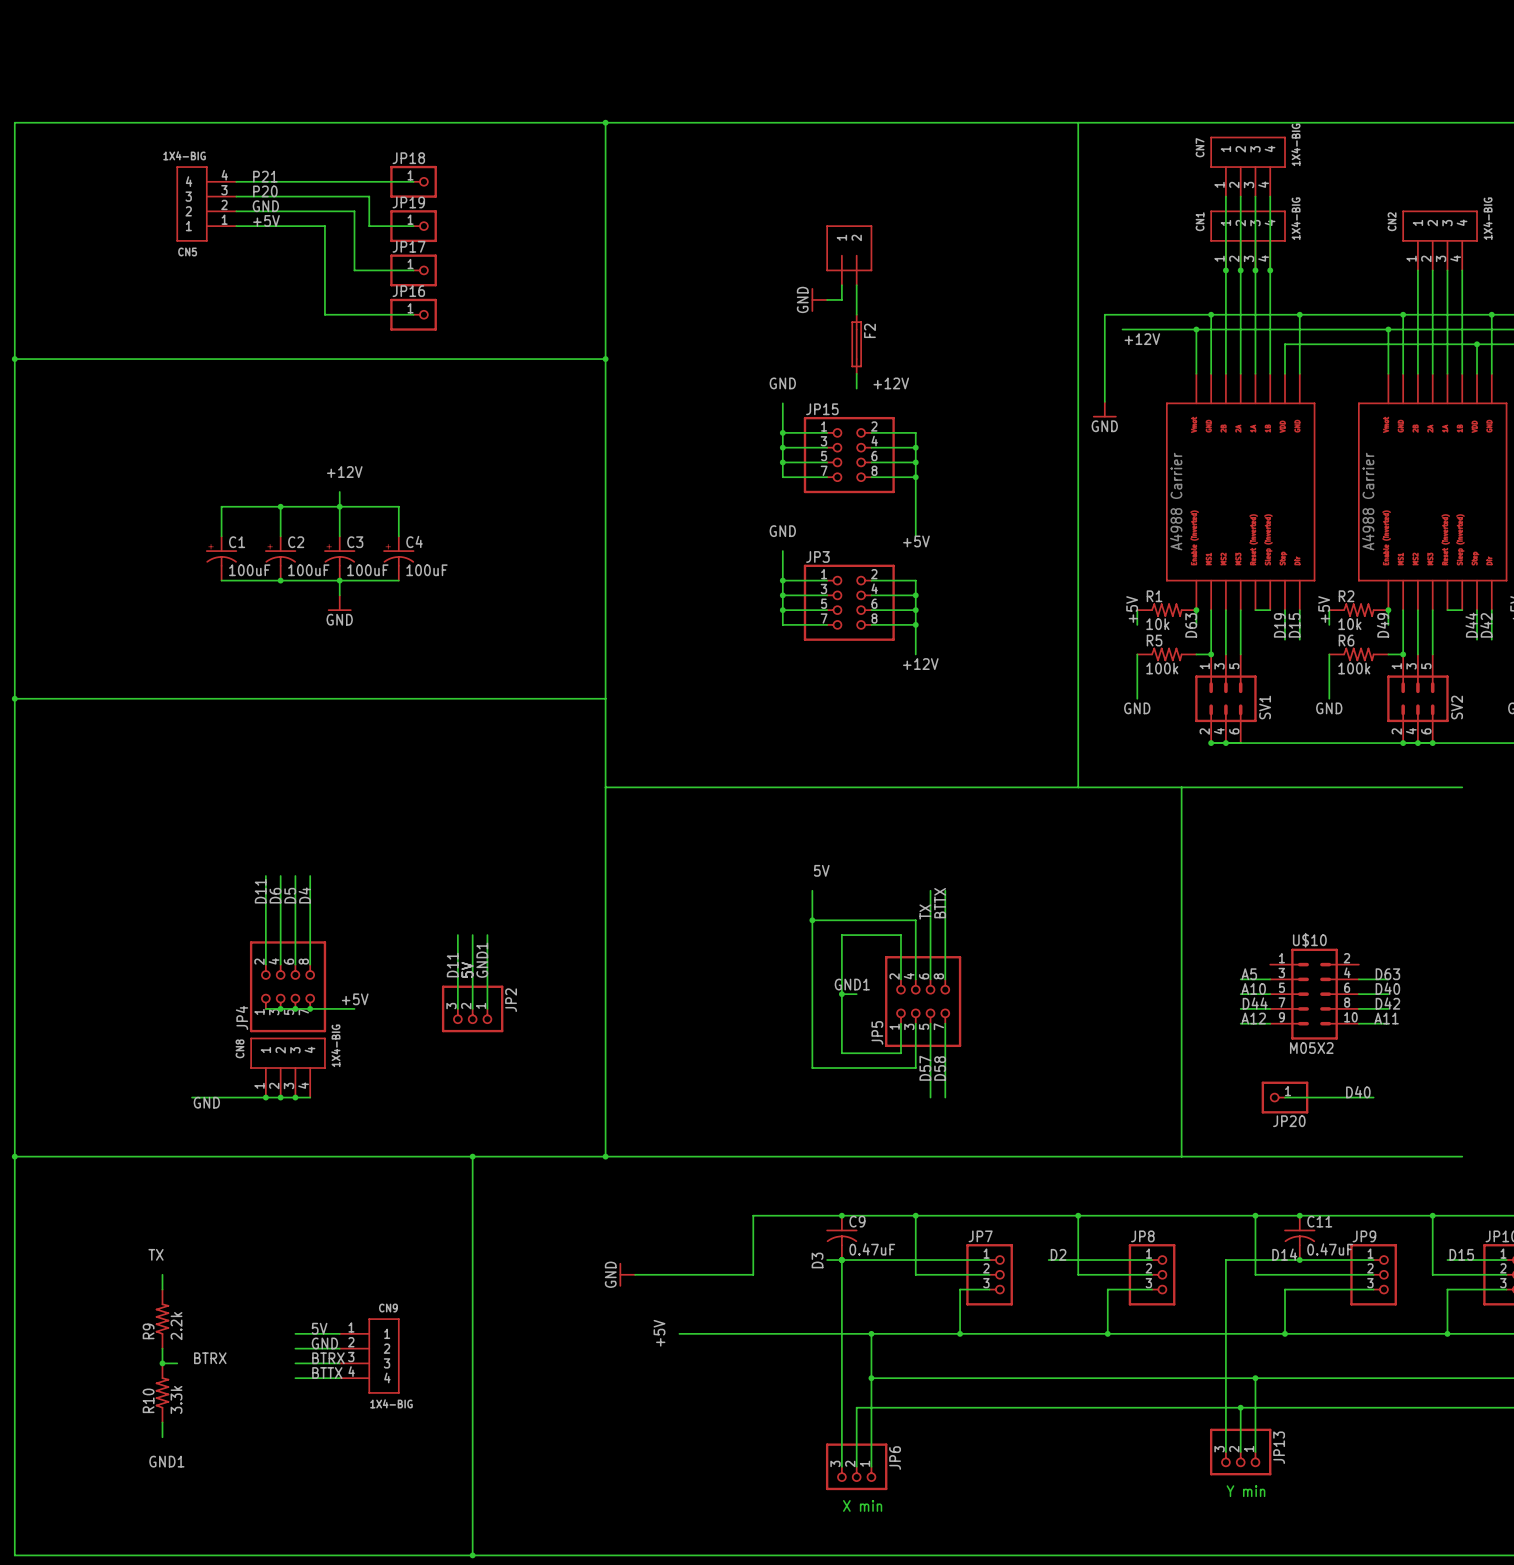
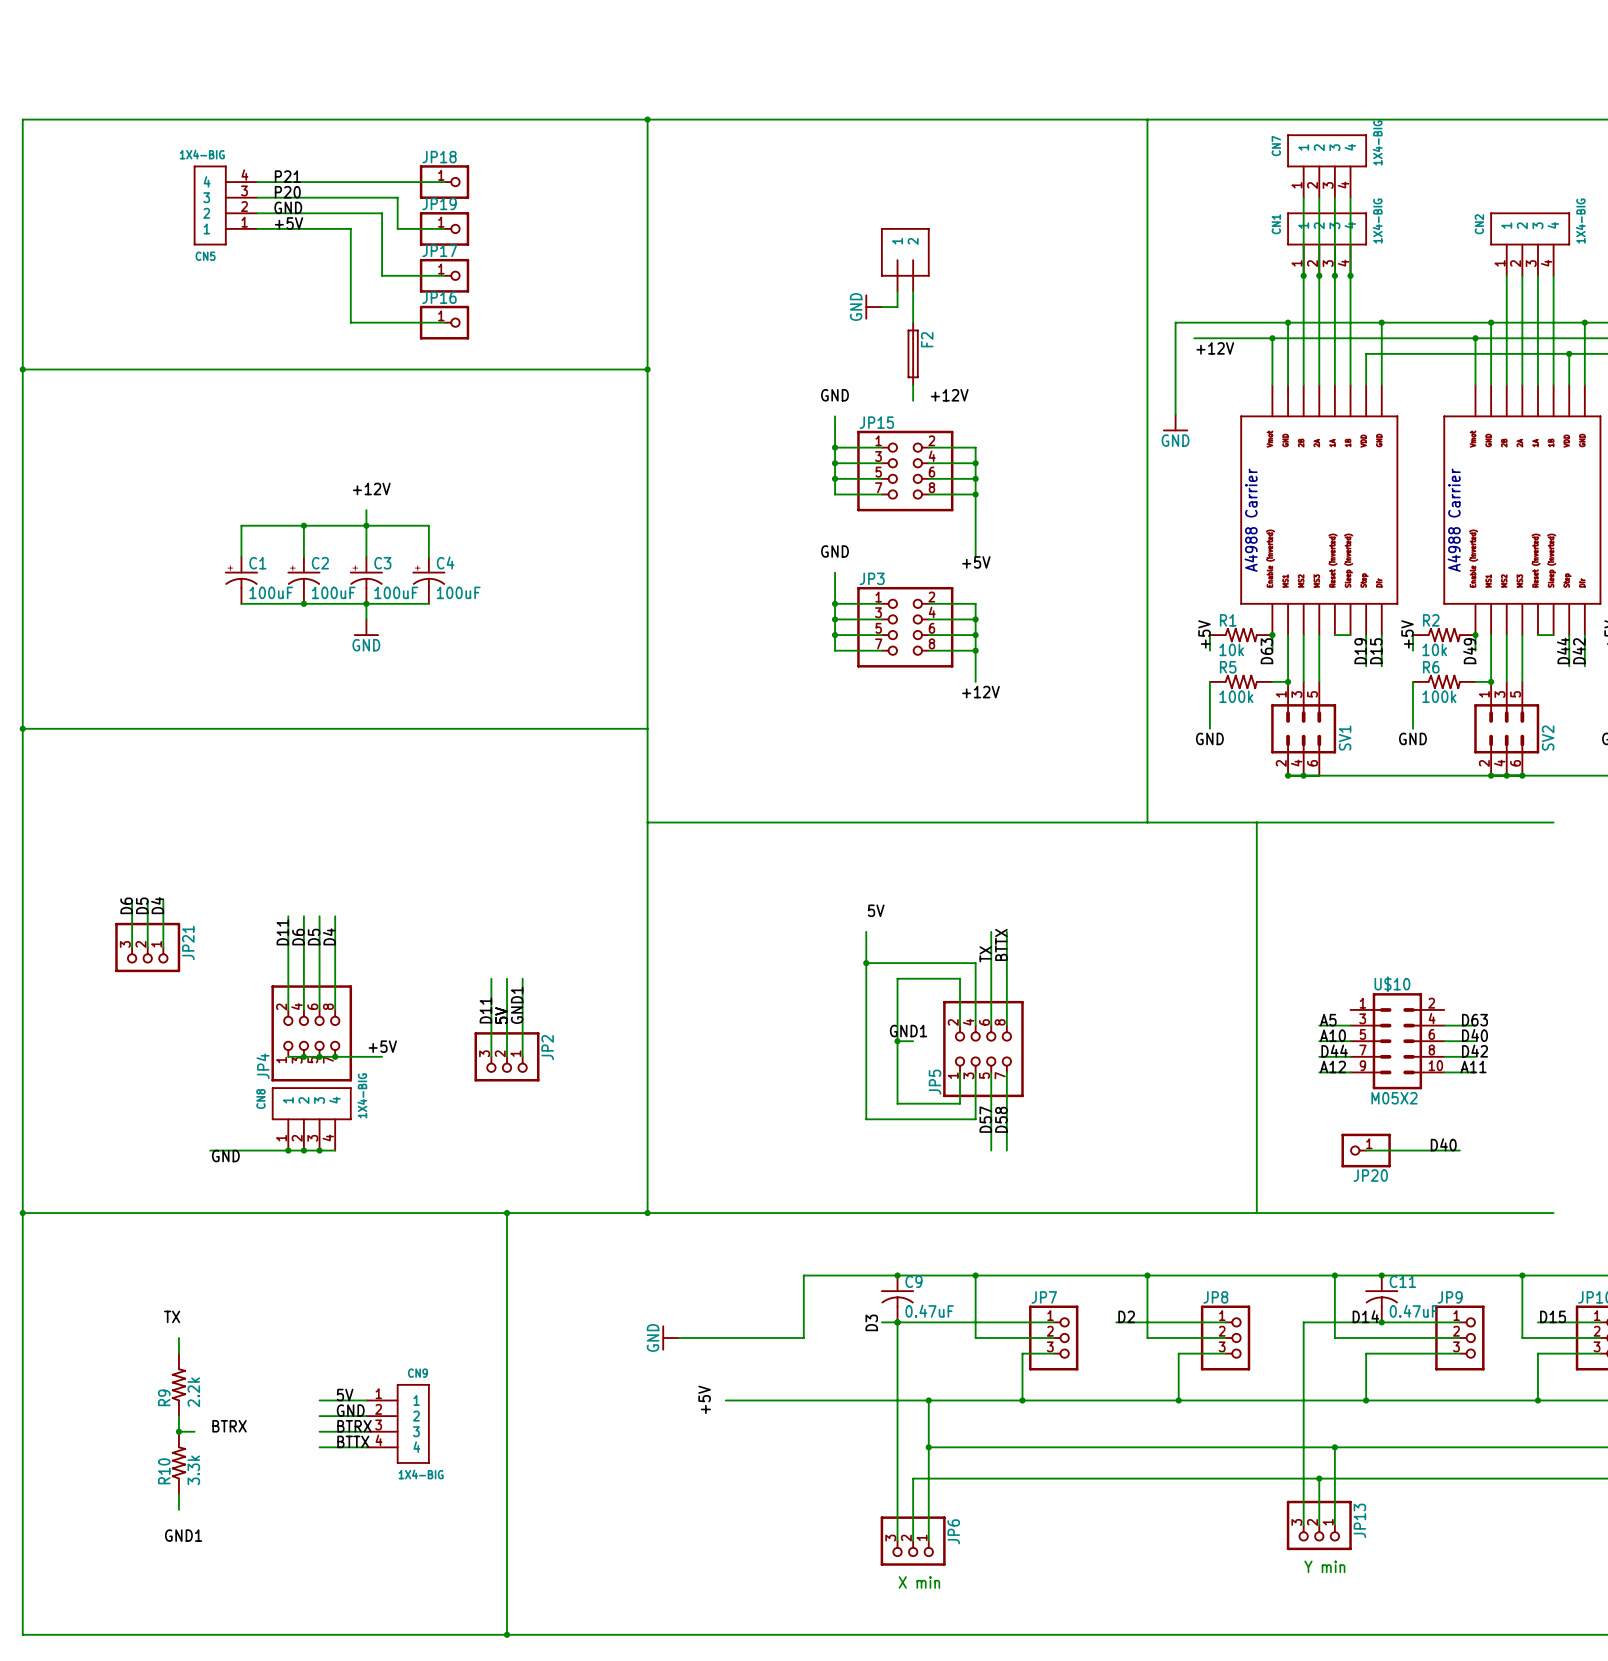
wire: none -> (132, 900) (132, 947)
wire: none -> (147, 900) (147, 947)
wire: none -> (163, 900) (163, 947)
label: none -> D4 (157, 905)
label: none -> D6 (126, 905)
label: none -> D5 (142, 905)
JP21: none -> (147, 947)

